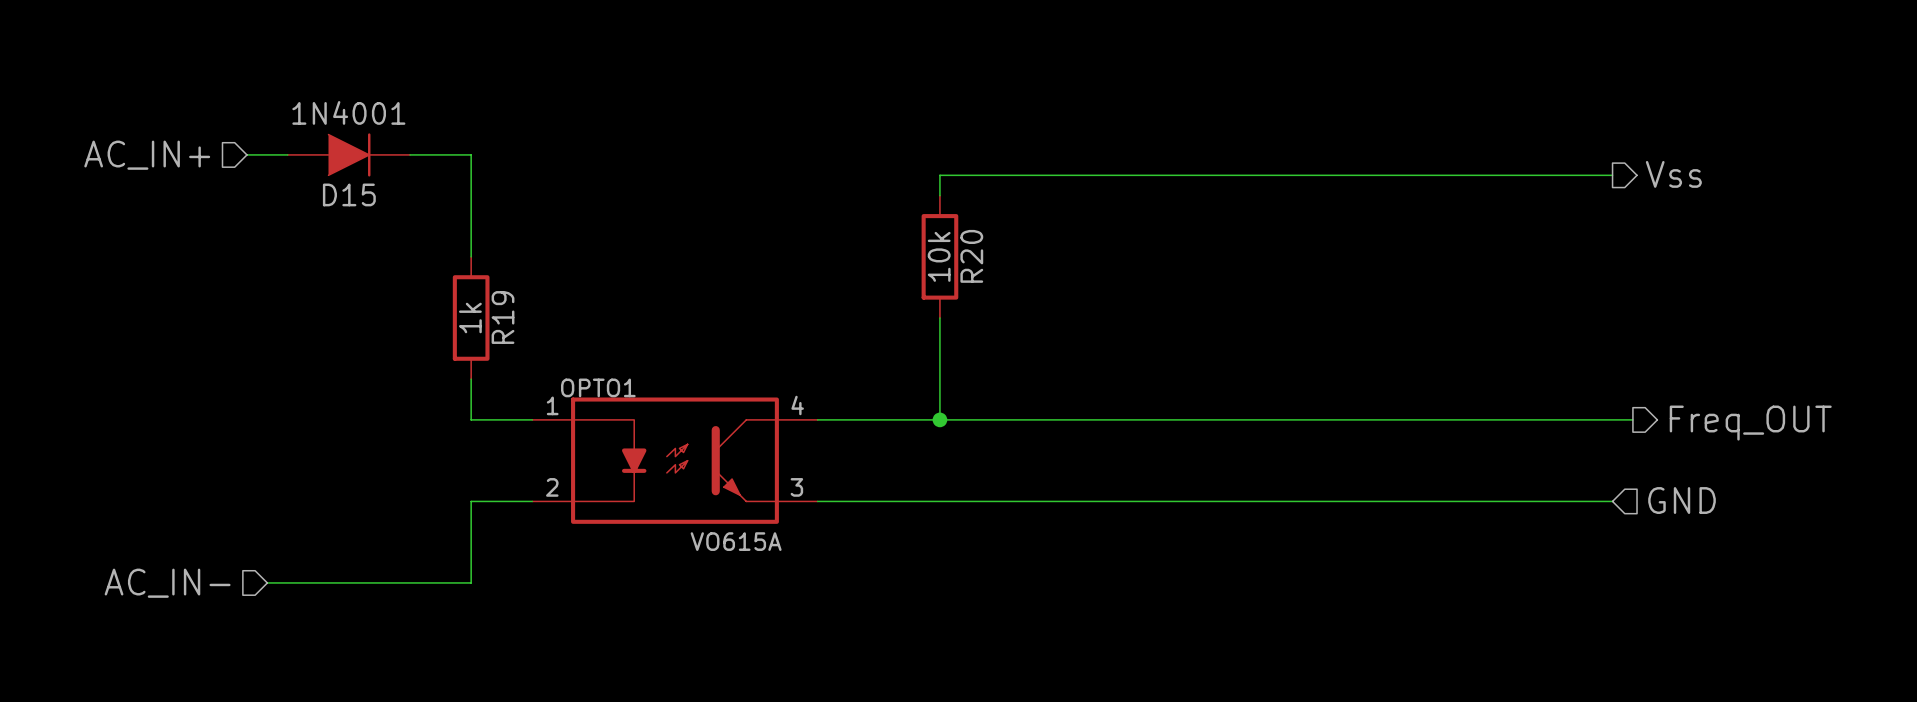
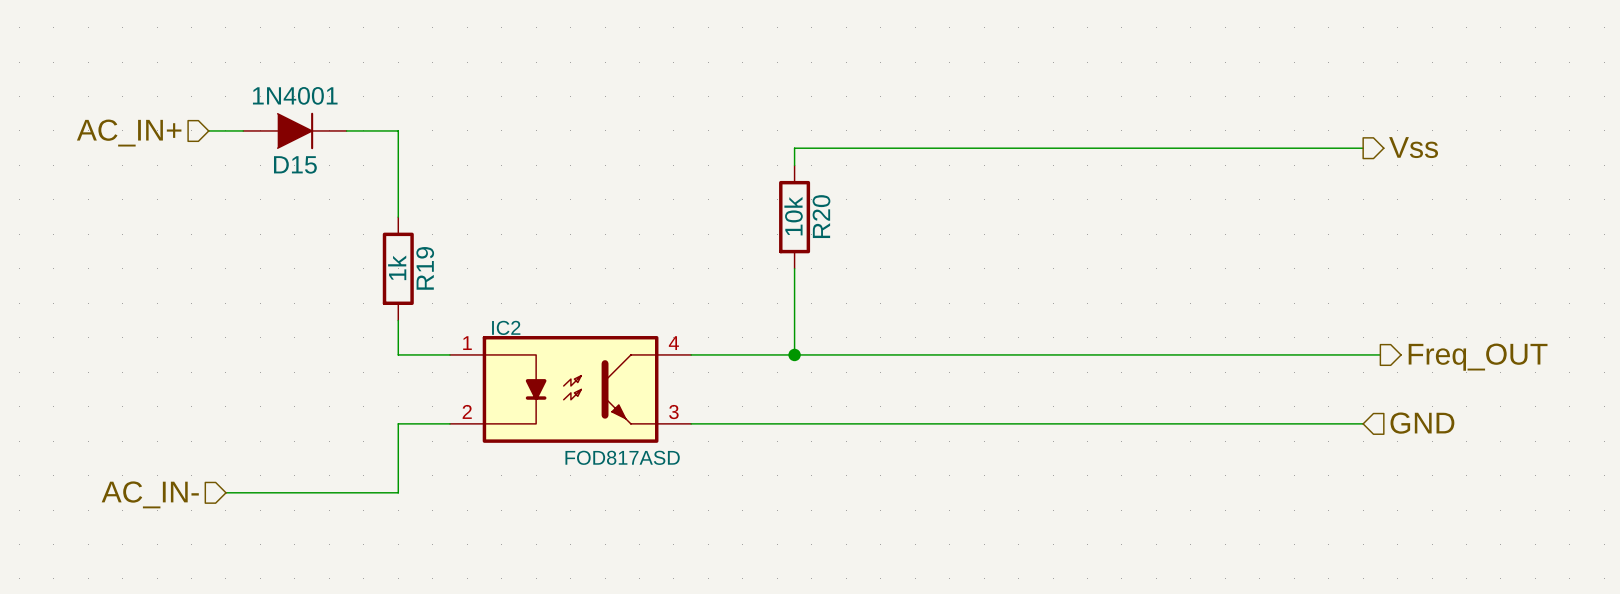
OPTO1 name: OPTO1 (598, 387) -> IC2 (506, 327)
OPTO1 value: VO615A (736, 541) -> FOD817ASD (622, 457)

